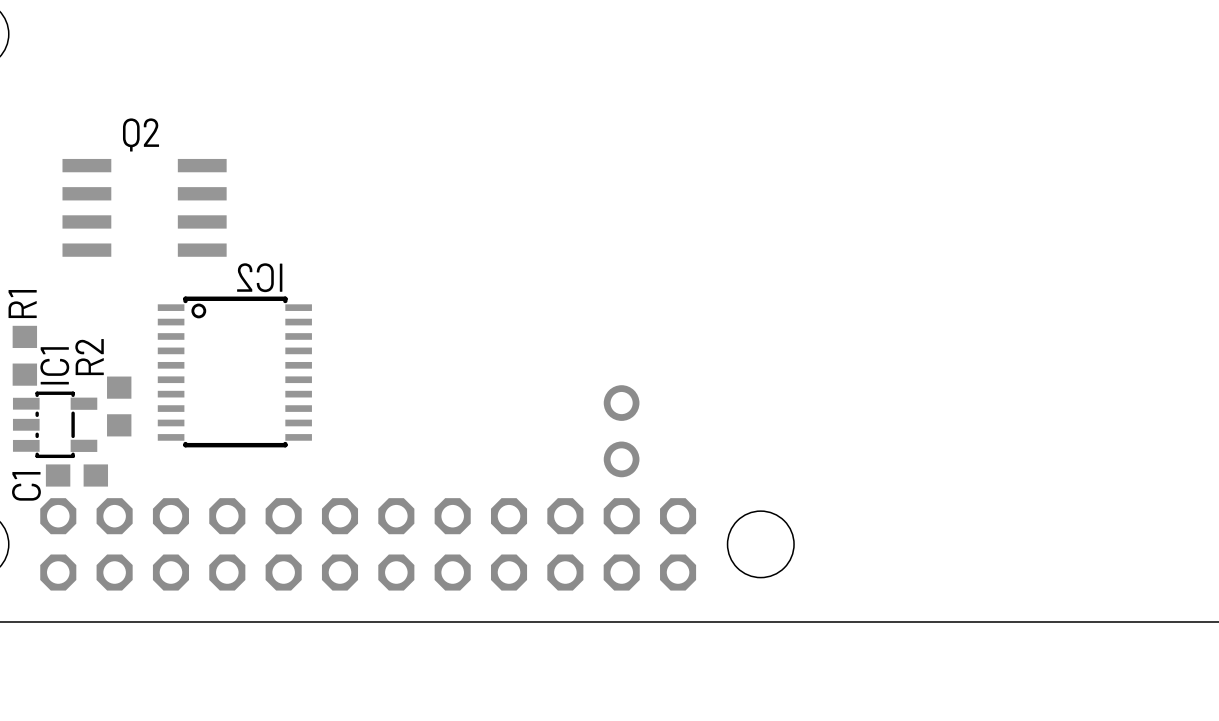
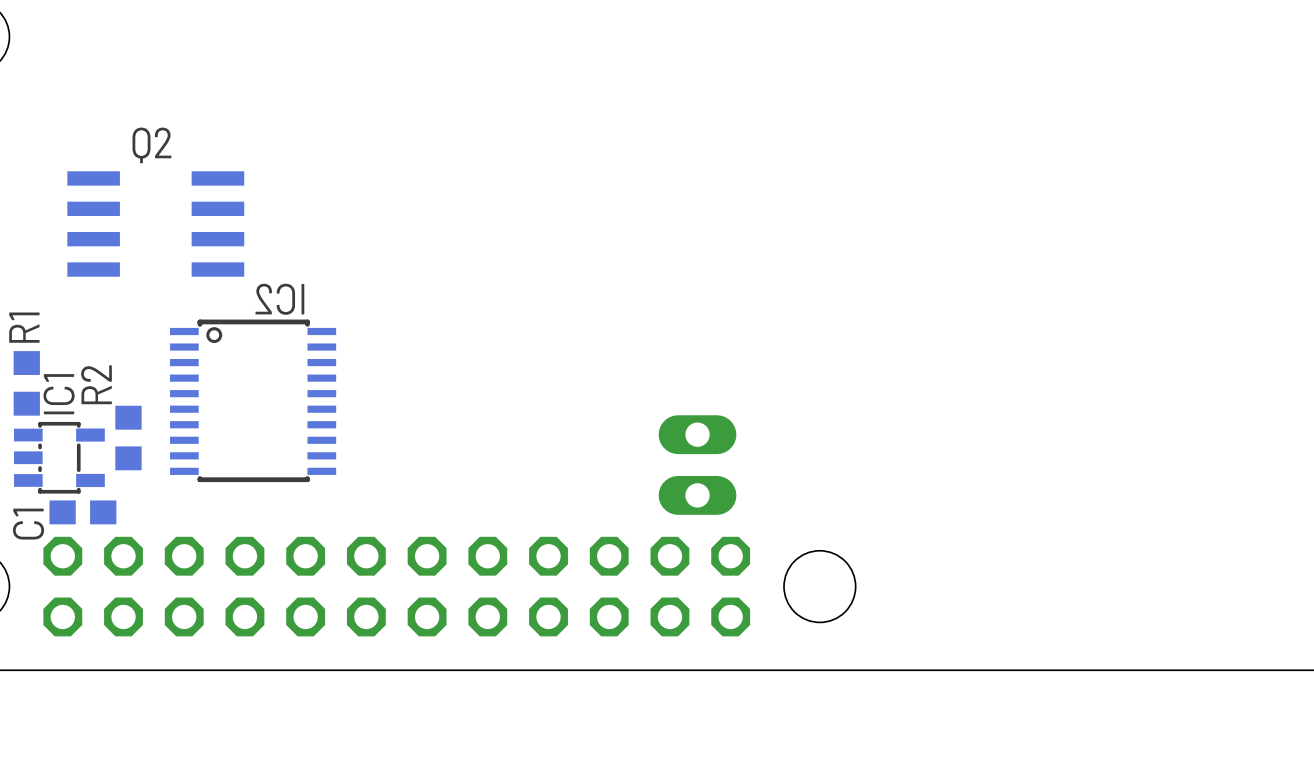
part: (621, 431) -> none
part: none -> (697, 465)

